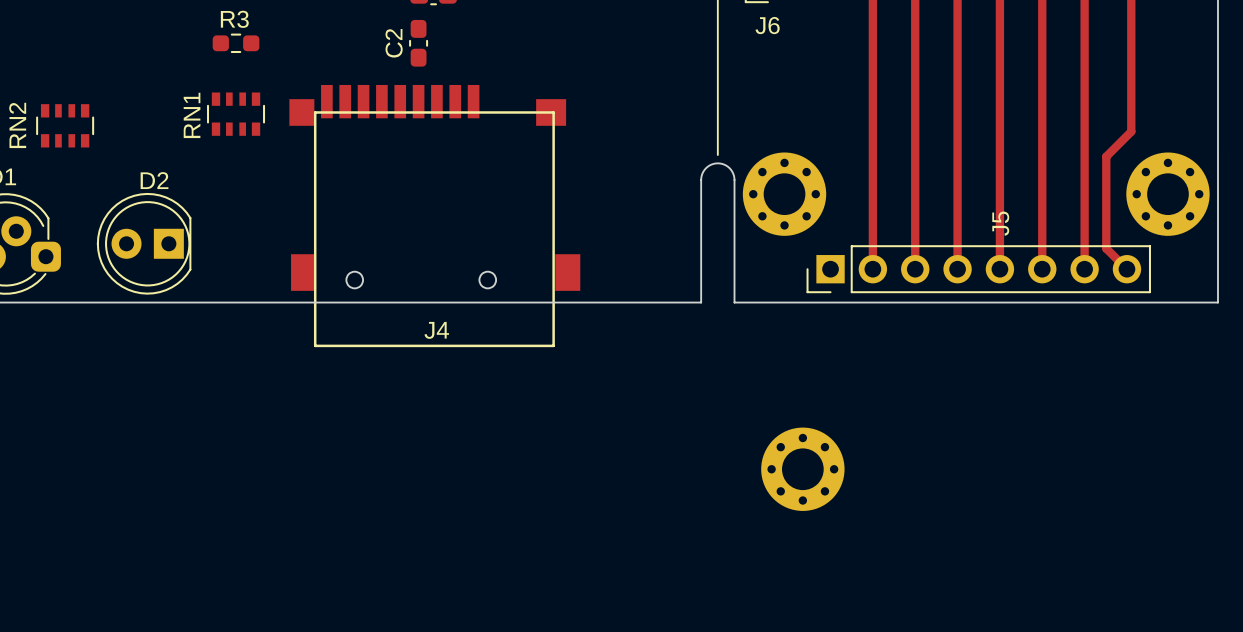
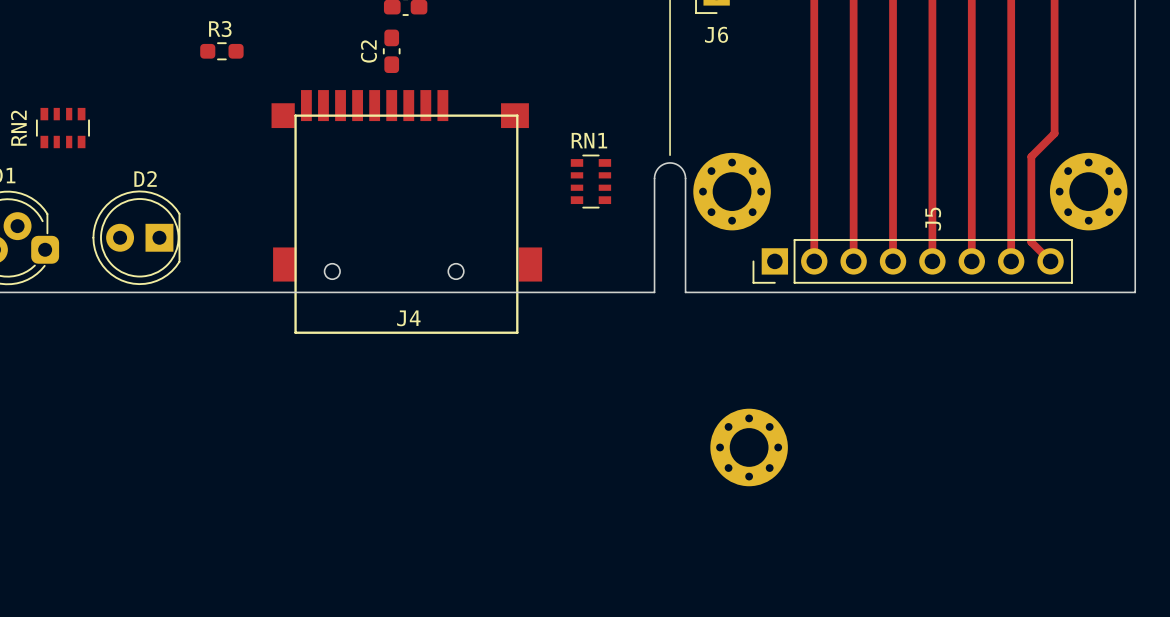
RN1 rotation: 0° (236, 114) -> 90° clockwise (590, 181)
RN1 position: (236, 114) -> (590, 181)

